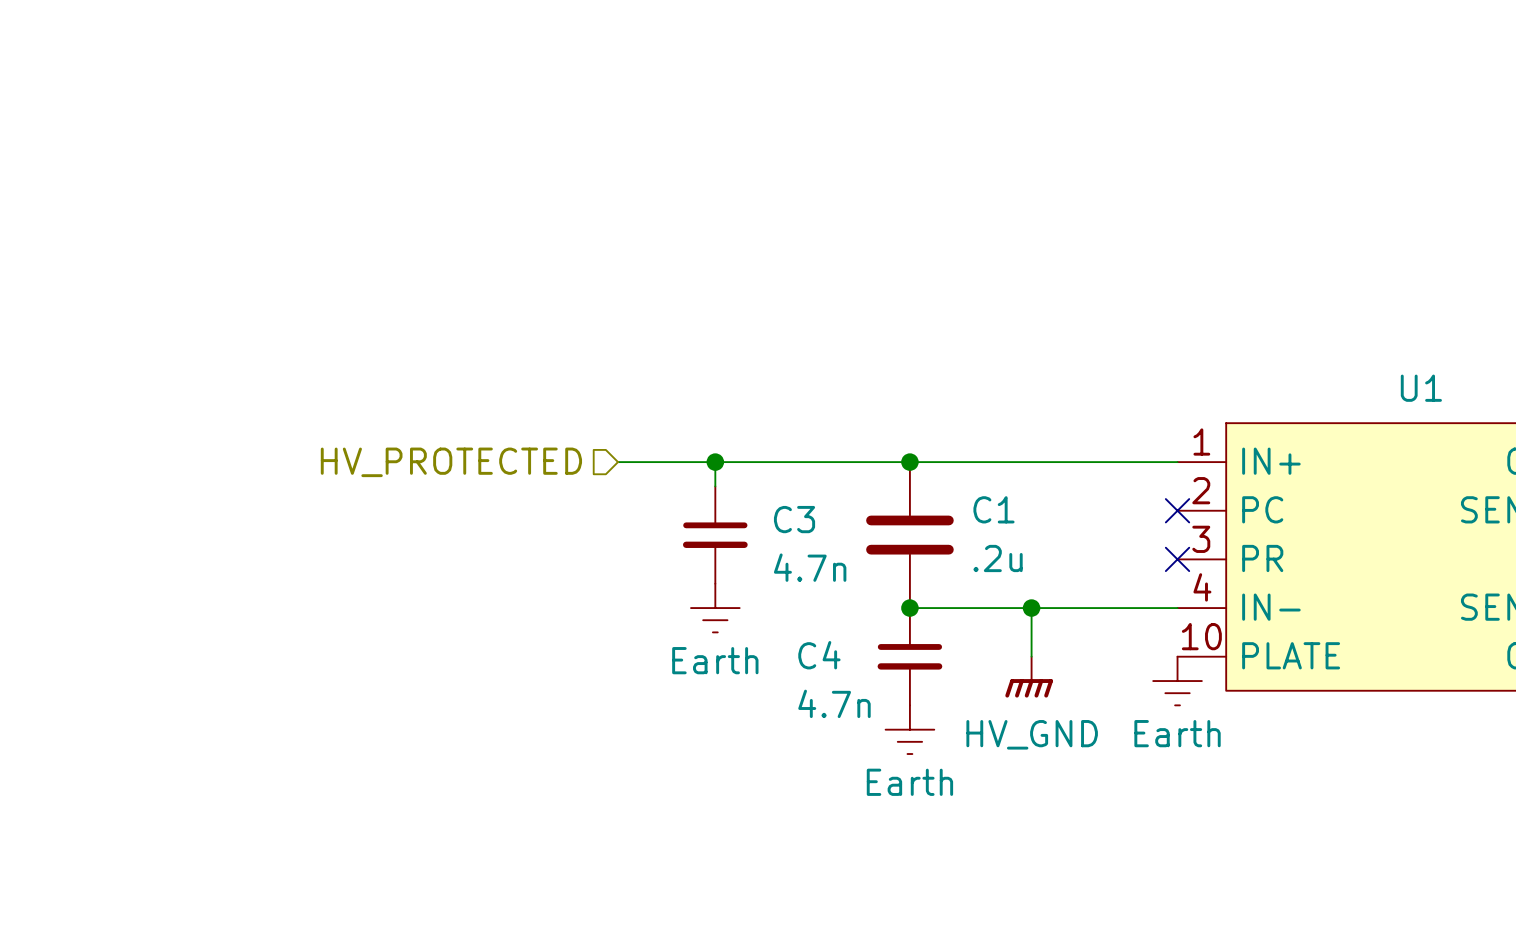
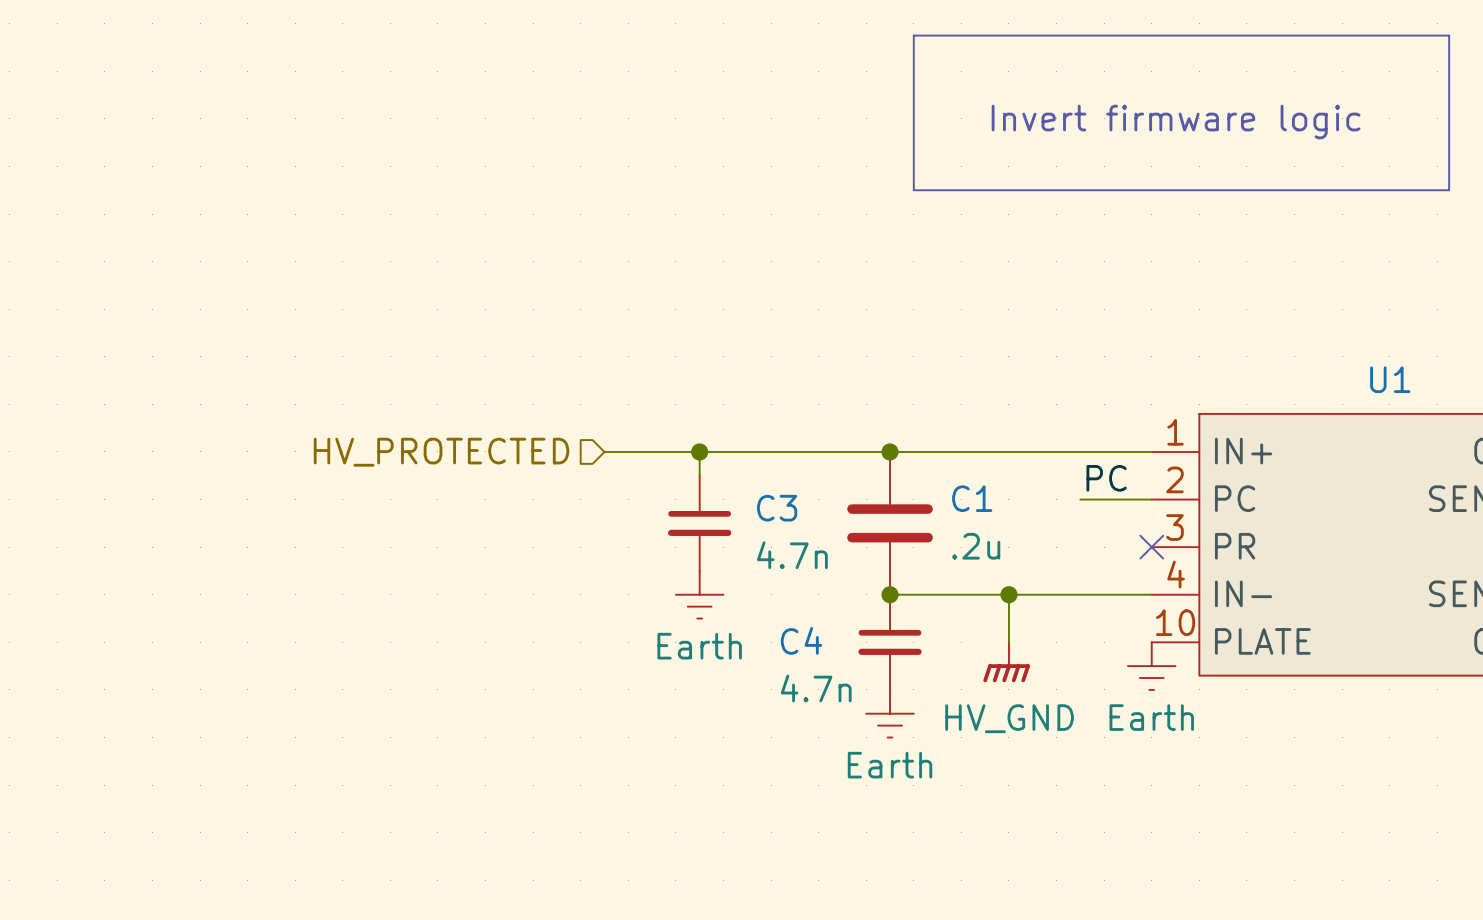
line: none -> (913, 35) (1449, 35) (1449, 190) (913, 190) (913, 35)
text: none -> Invert firmware logic (1176, 122)
label: none -> PC (1106, 478)
wire: none -> (1080, 499) (1151, 499)
no-connect mark: (1177, 510) -> none

